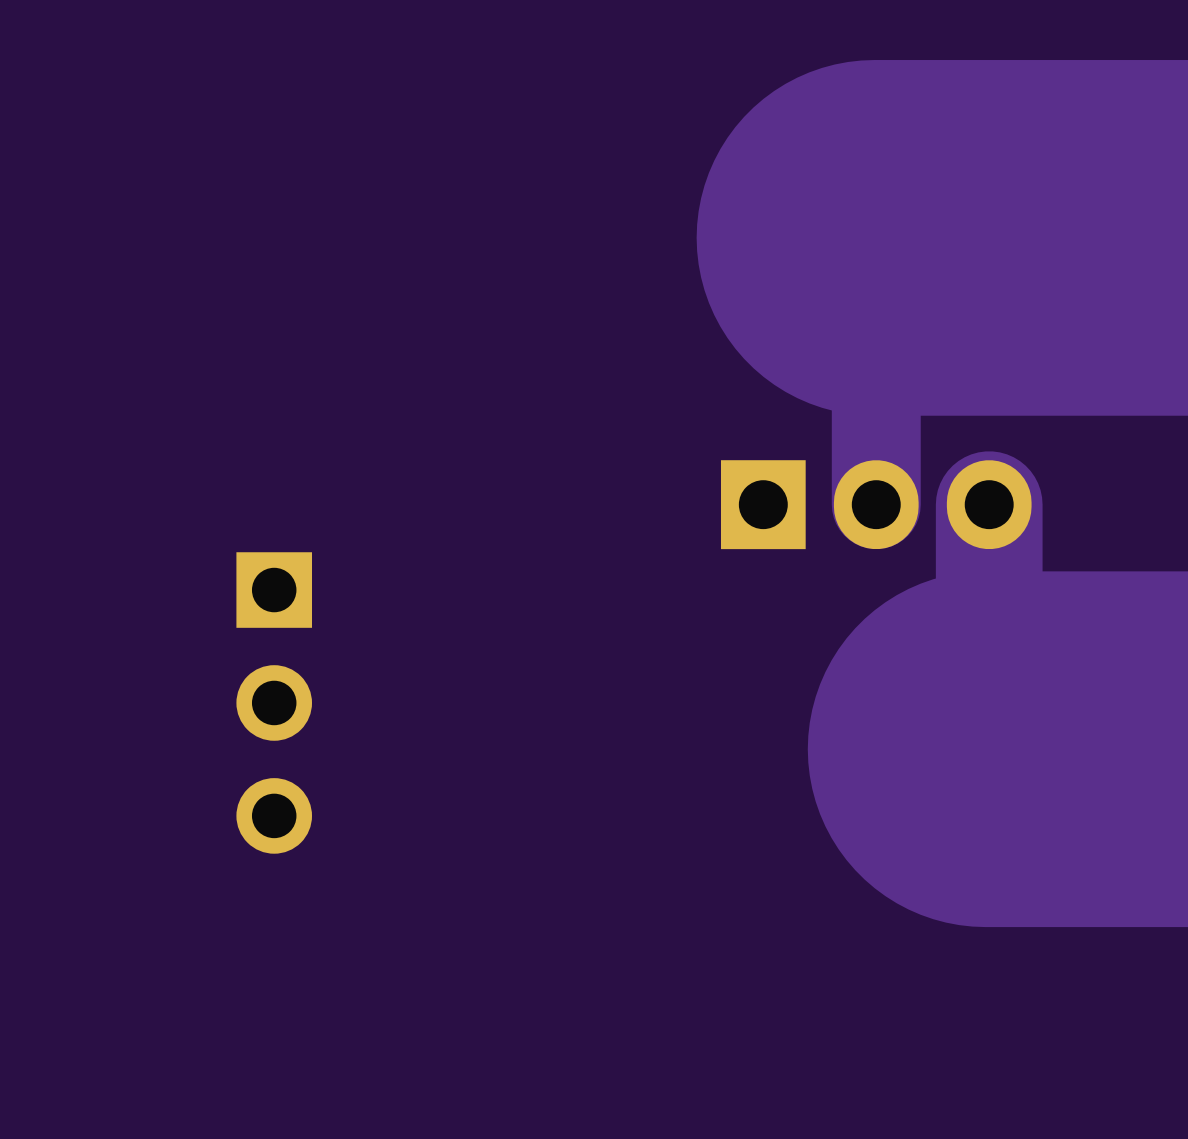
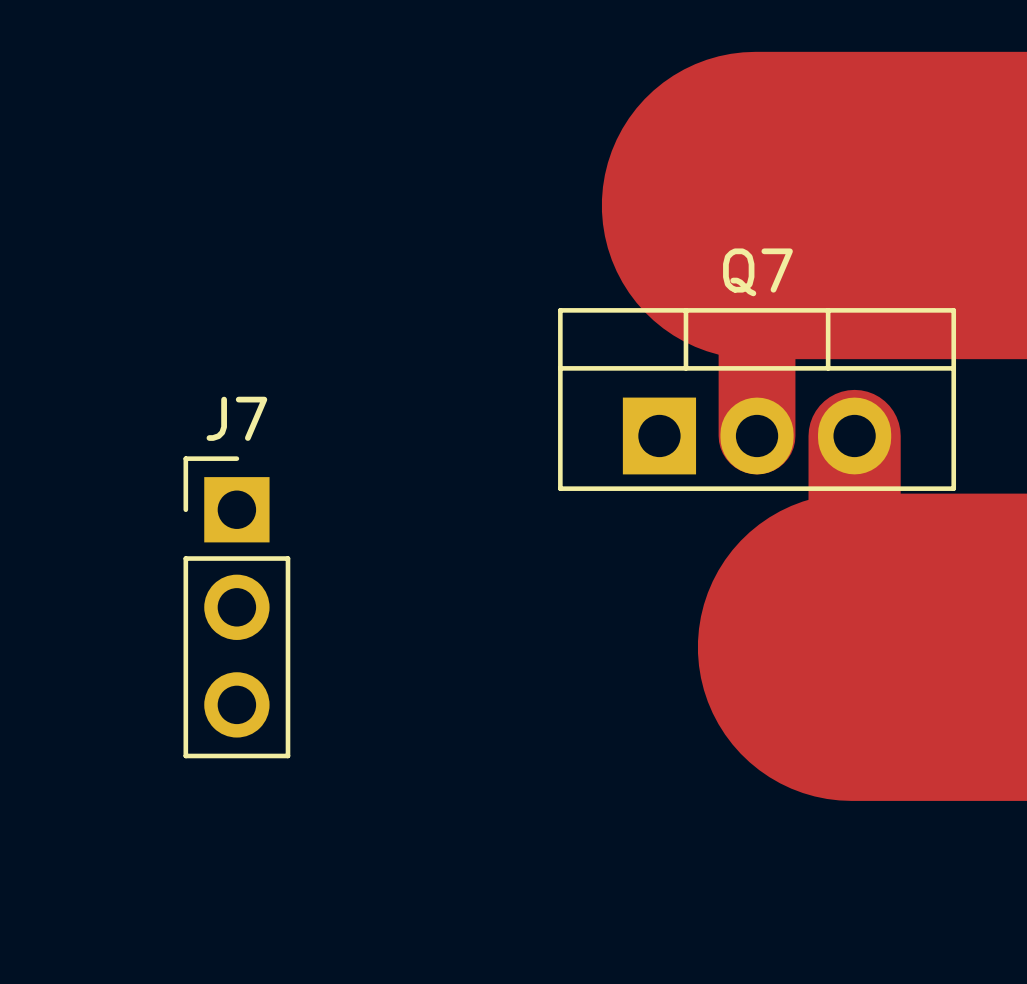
Q7: none -> (757, 399)
J7: none -> (236, 607)

